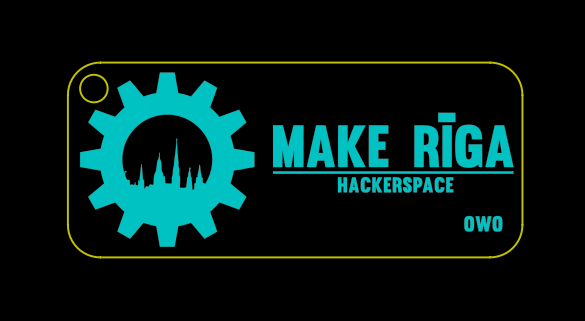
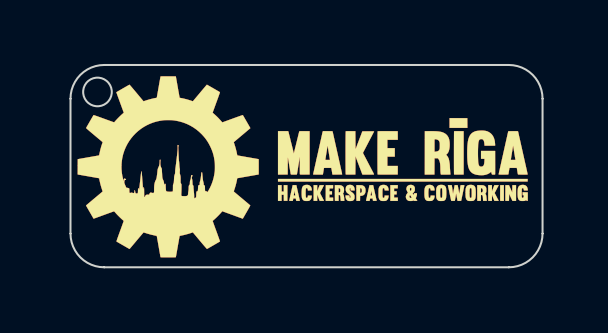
drawing: [80, 72, 514, 247] -> none
drawing: none -> [77, 76, 528, 258]

